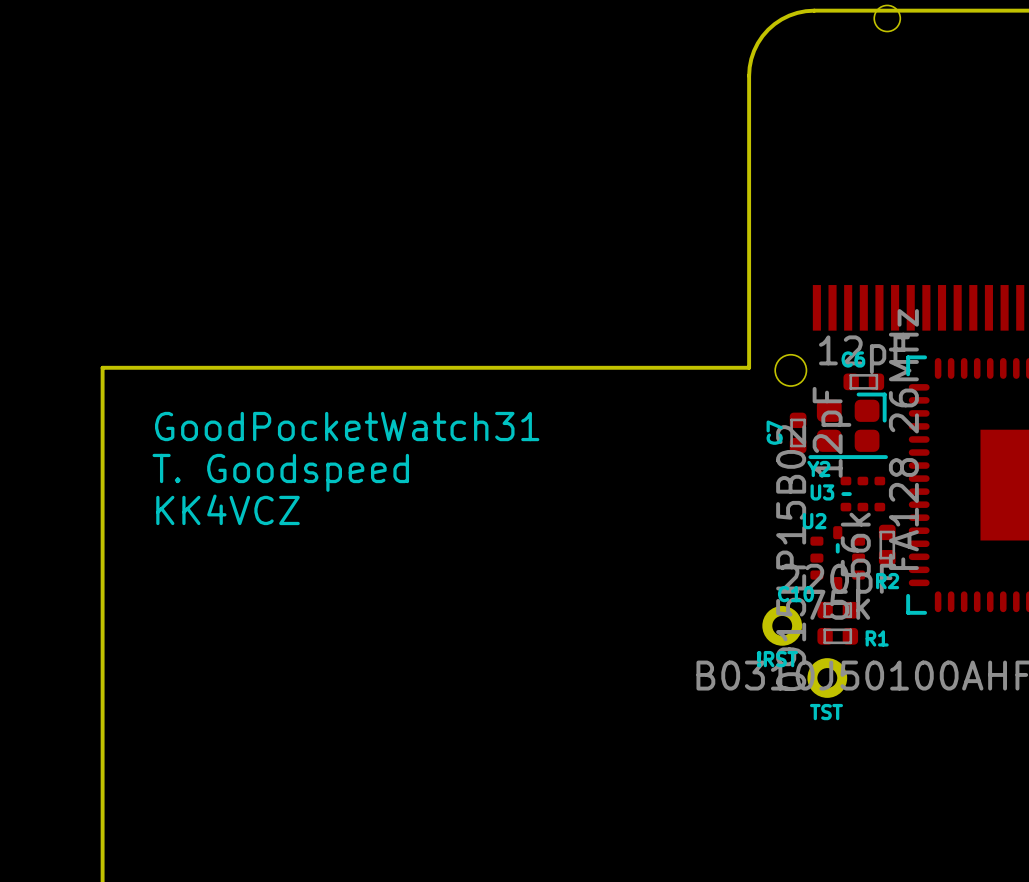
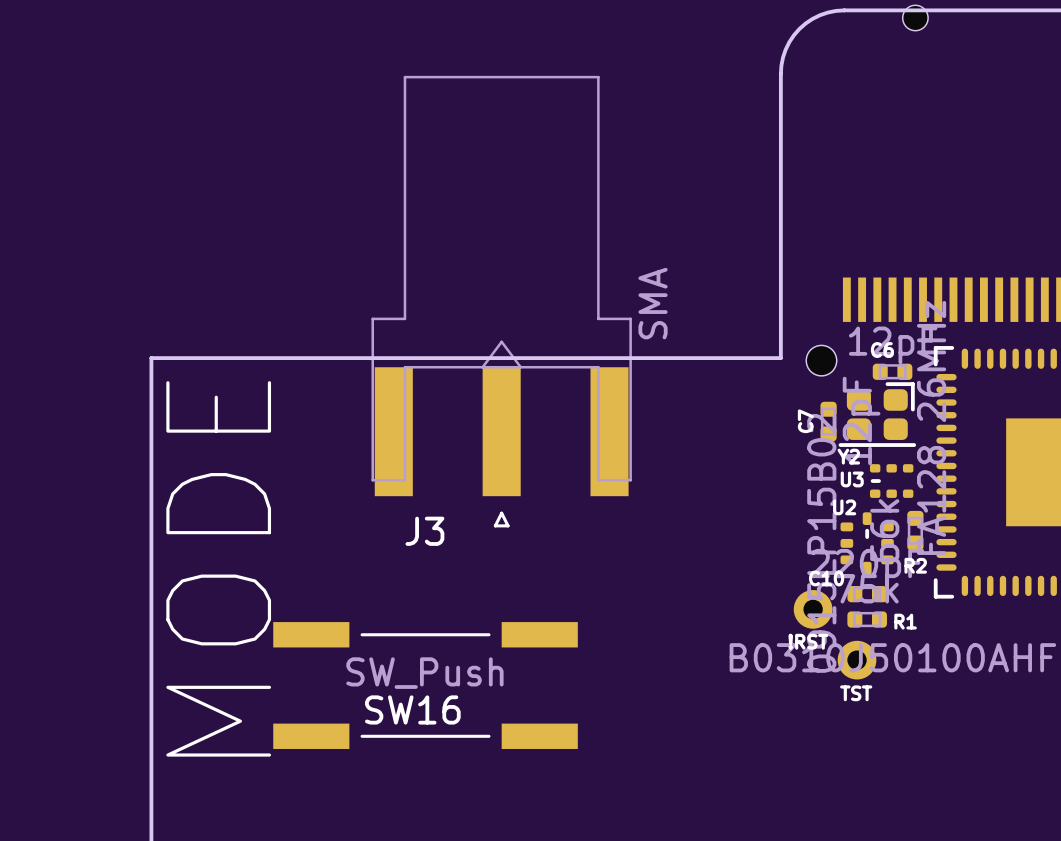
J3: none -> SMA (501, 301)
text: GoodPocketWatch31 (347, 426) -> none
text: T. Goodspeed (280, 472) -> none
text: KK4VCZ (228, 509) -> none
text: none -> MODE (218, 568)
SW16: none -> SW_Push (425, 685)

